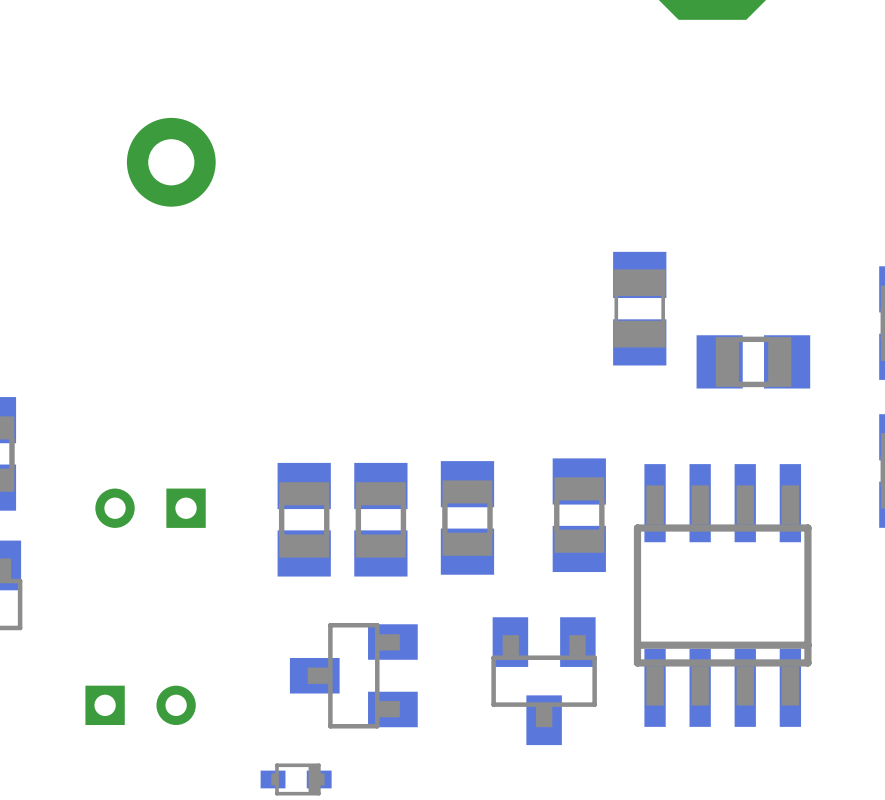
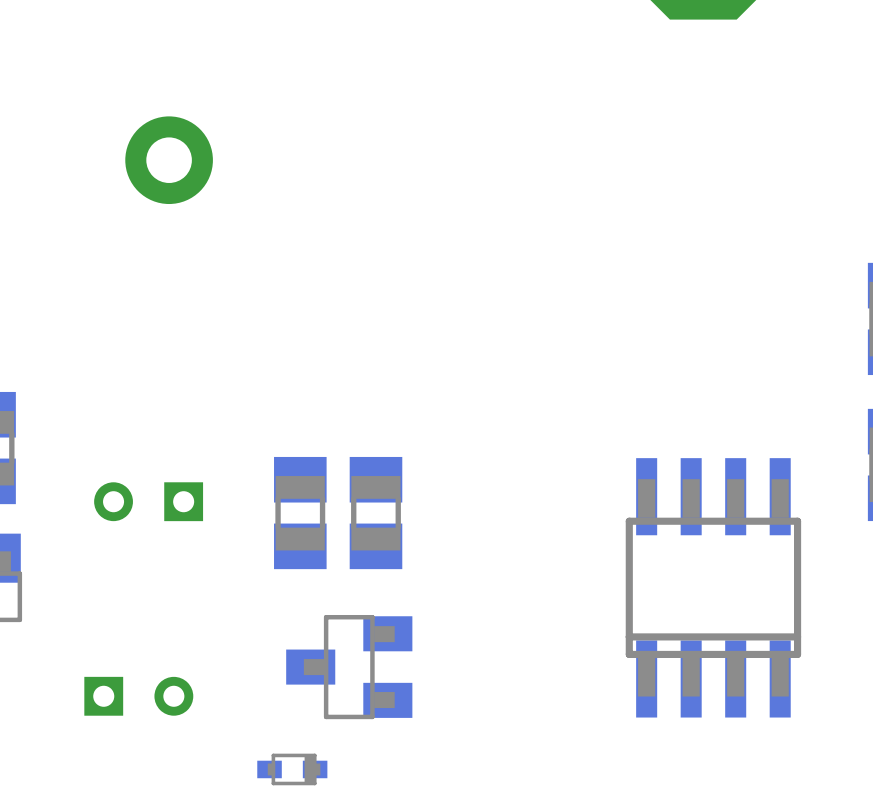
part: (639, 308) -> none
part: (753, 361) -> none
part: (579, 515) -> none
part: (467, 517) -> none
part: (544, 681) -> none

